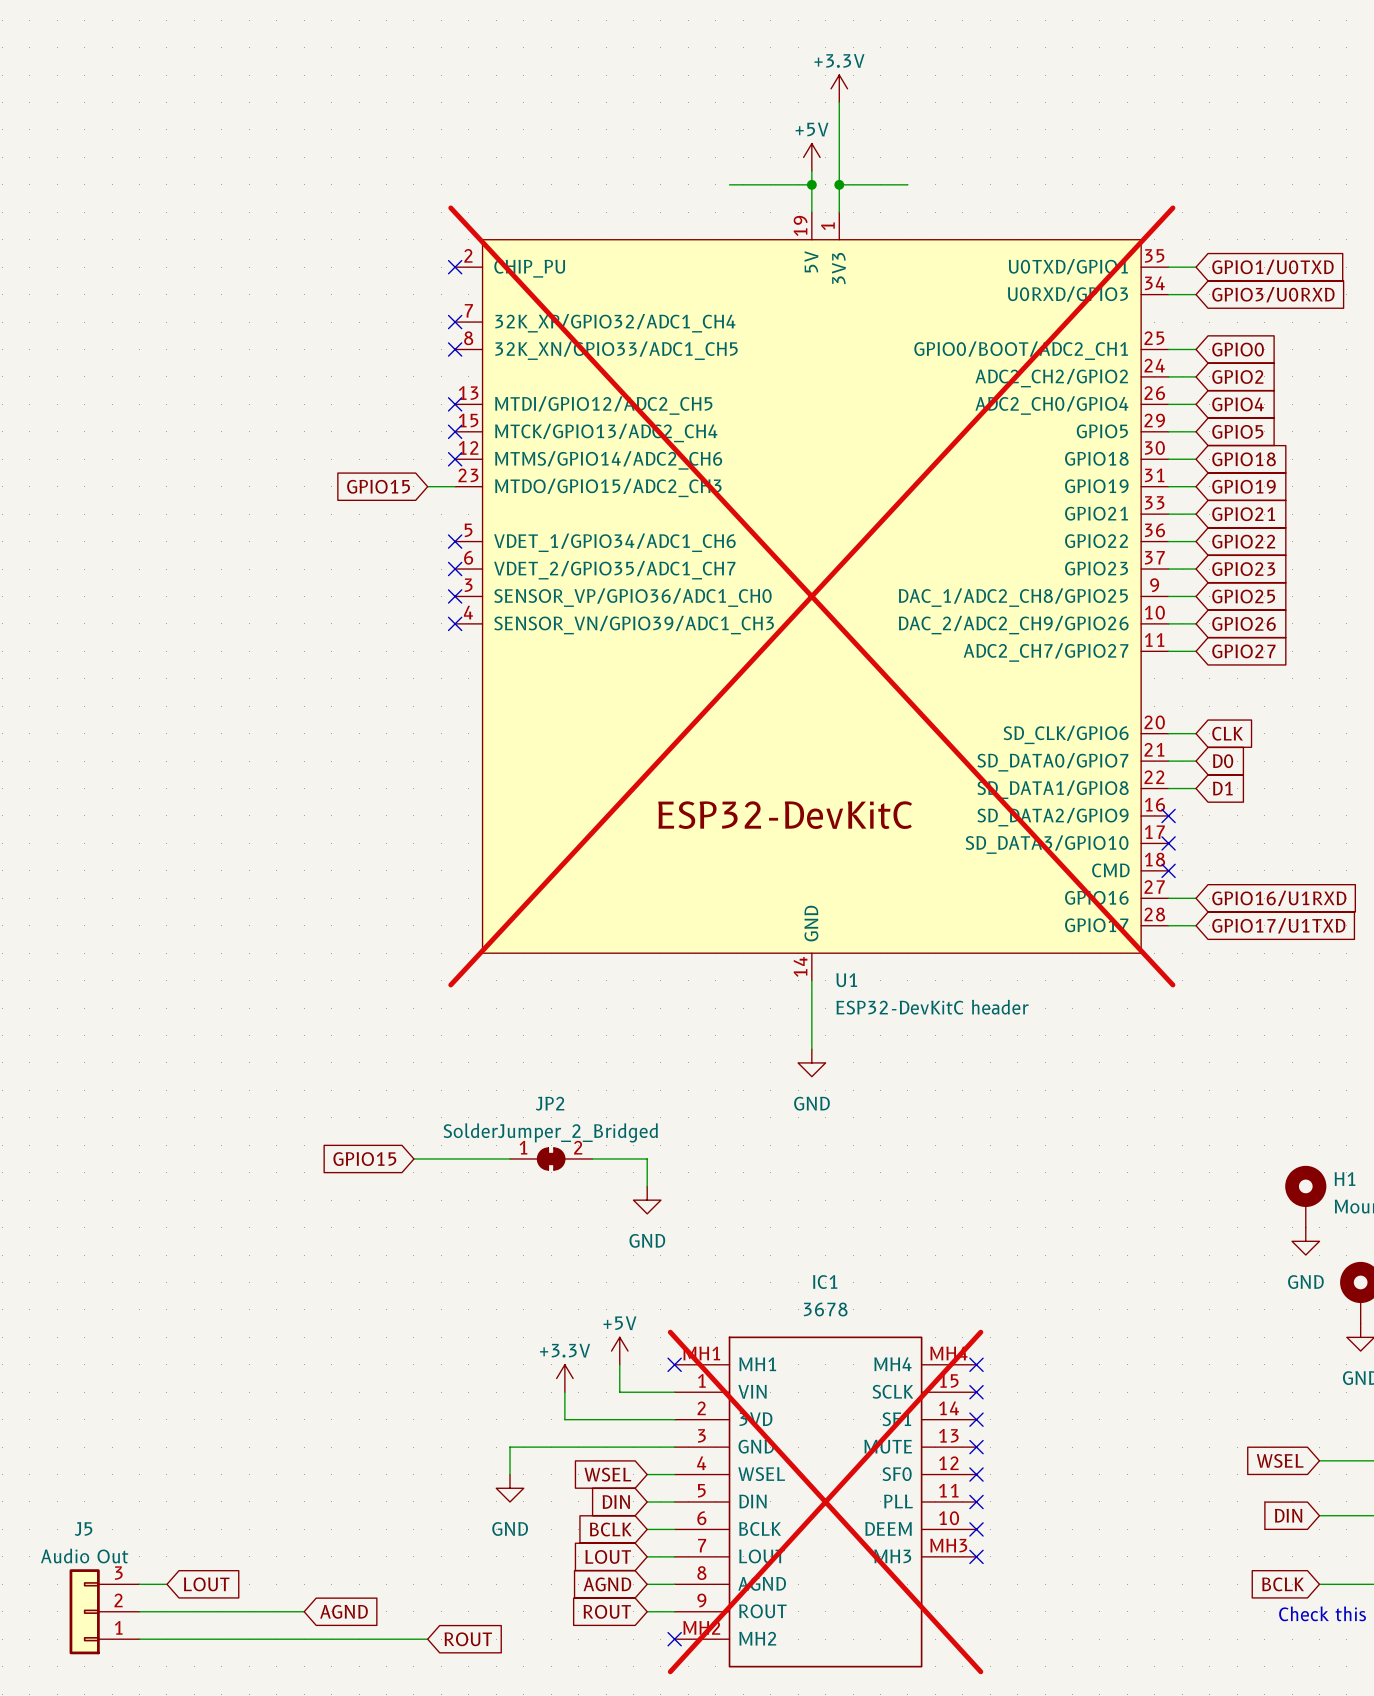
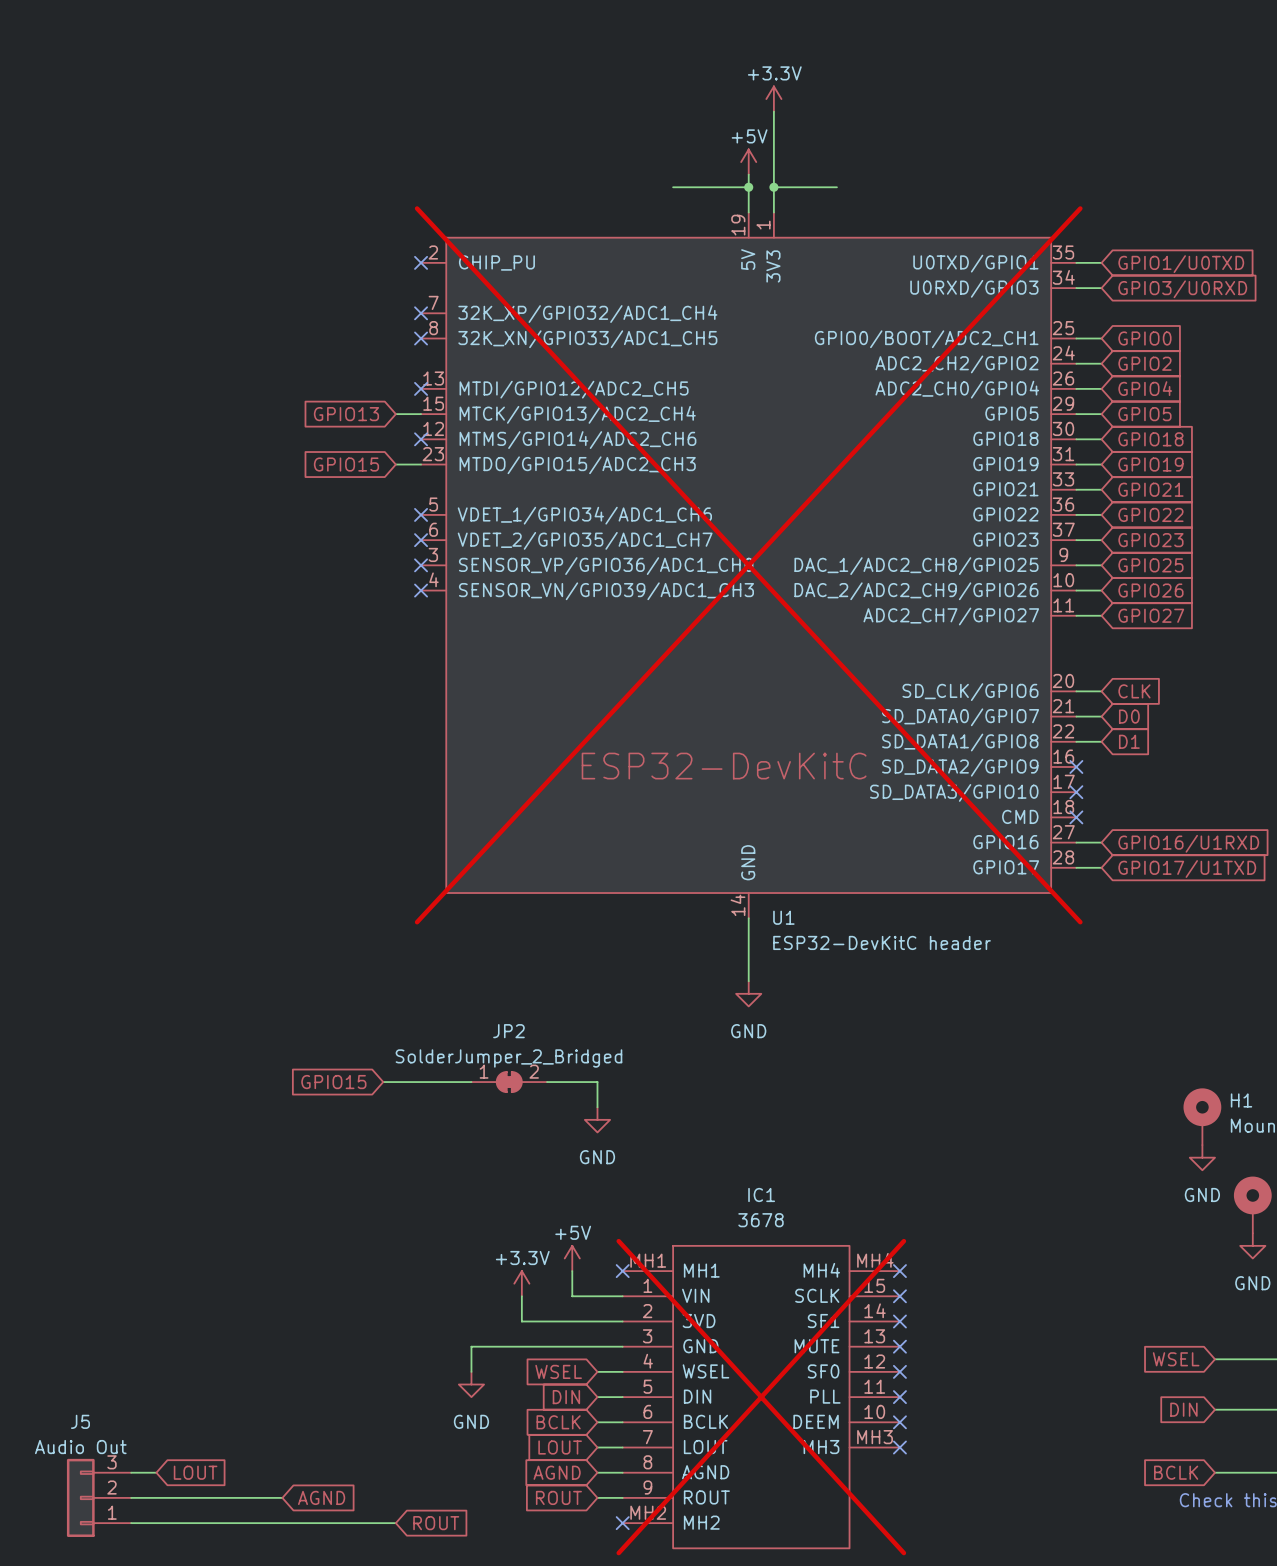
global label: none -> GPIO13 (346, 414)
wire: none -> (395, 414) (421, 414)
no-connect mark: (455, 431) -> none

